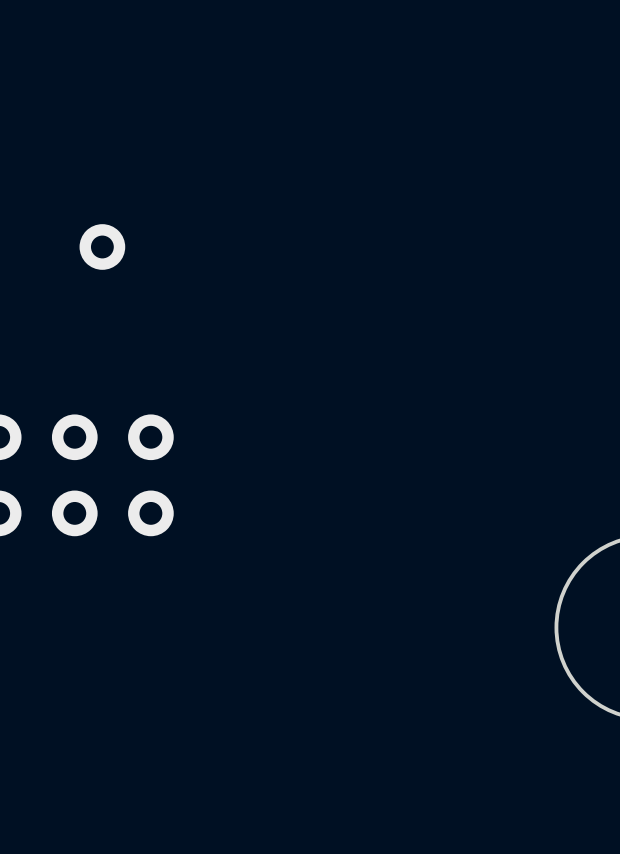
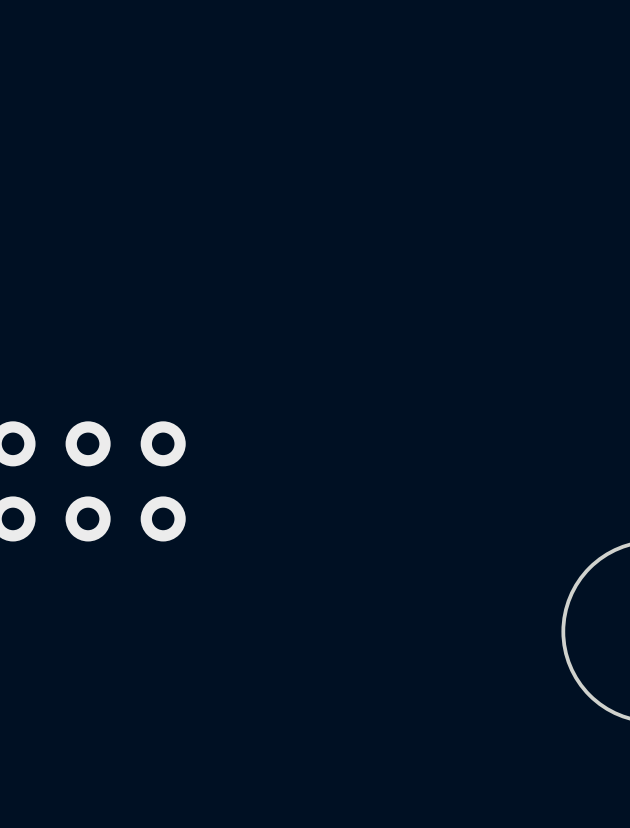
via: (102, 246) -> none

